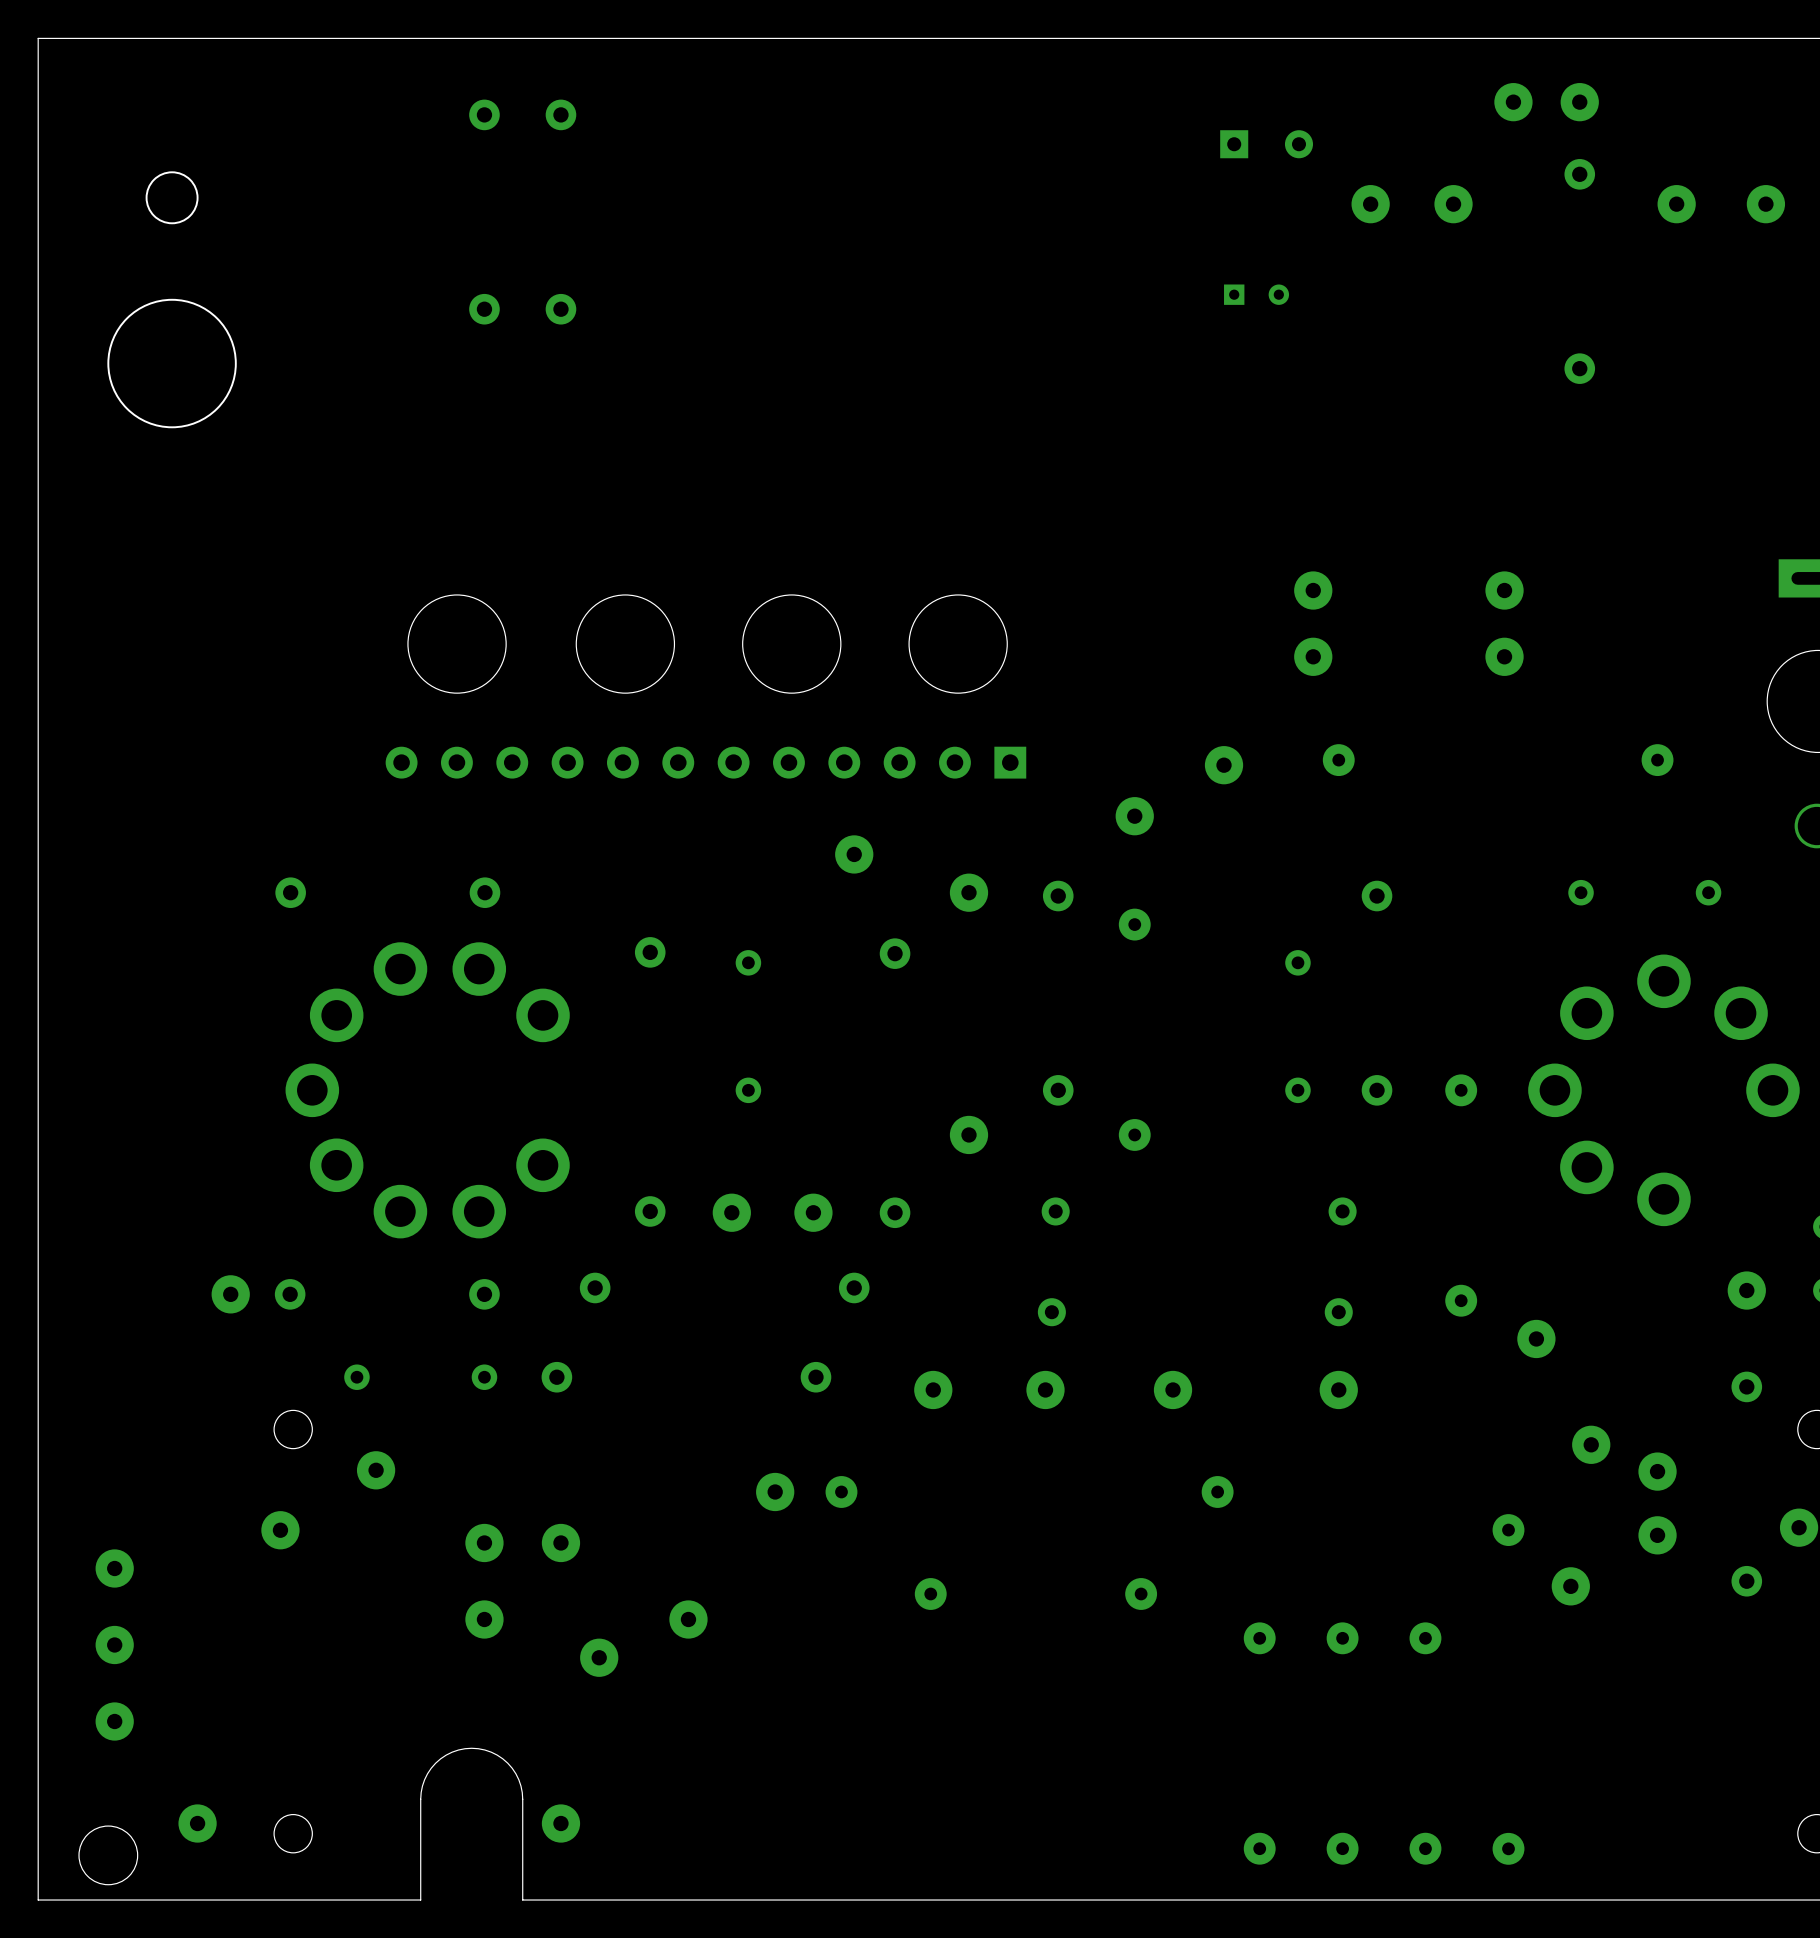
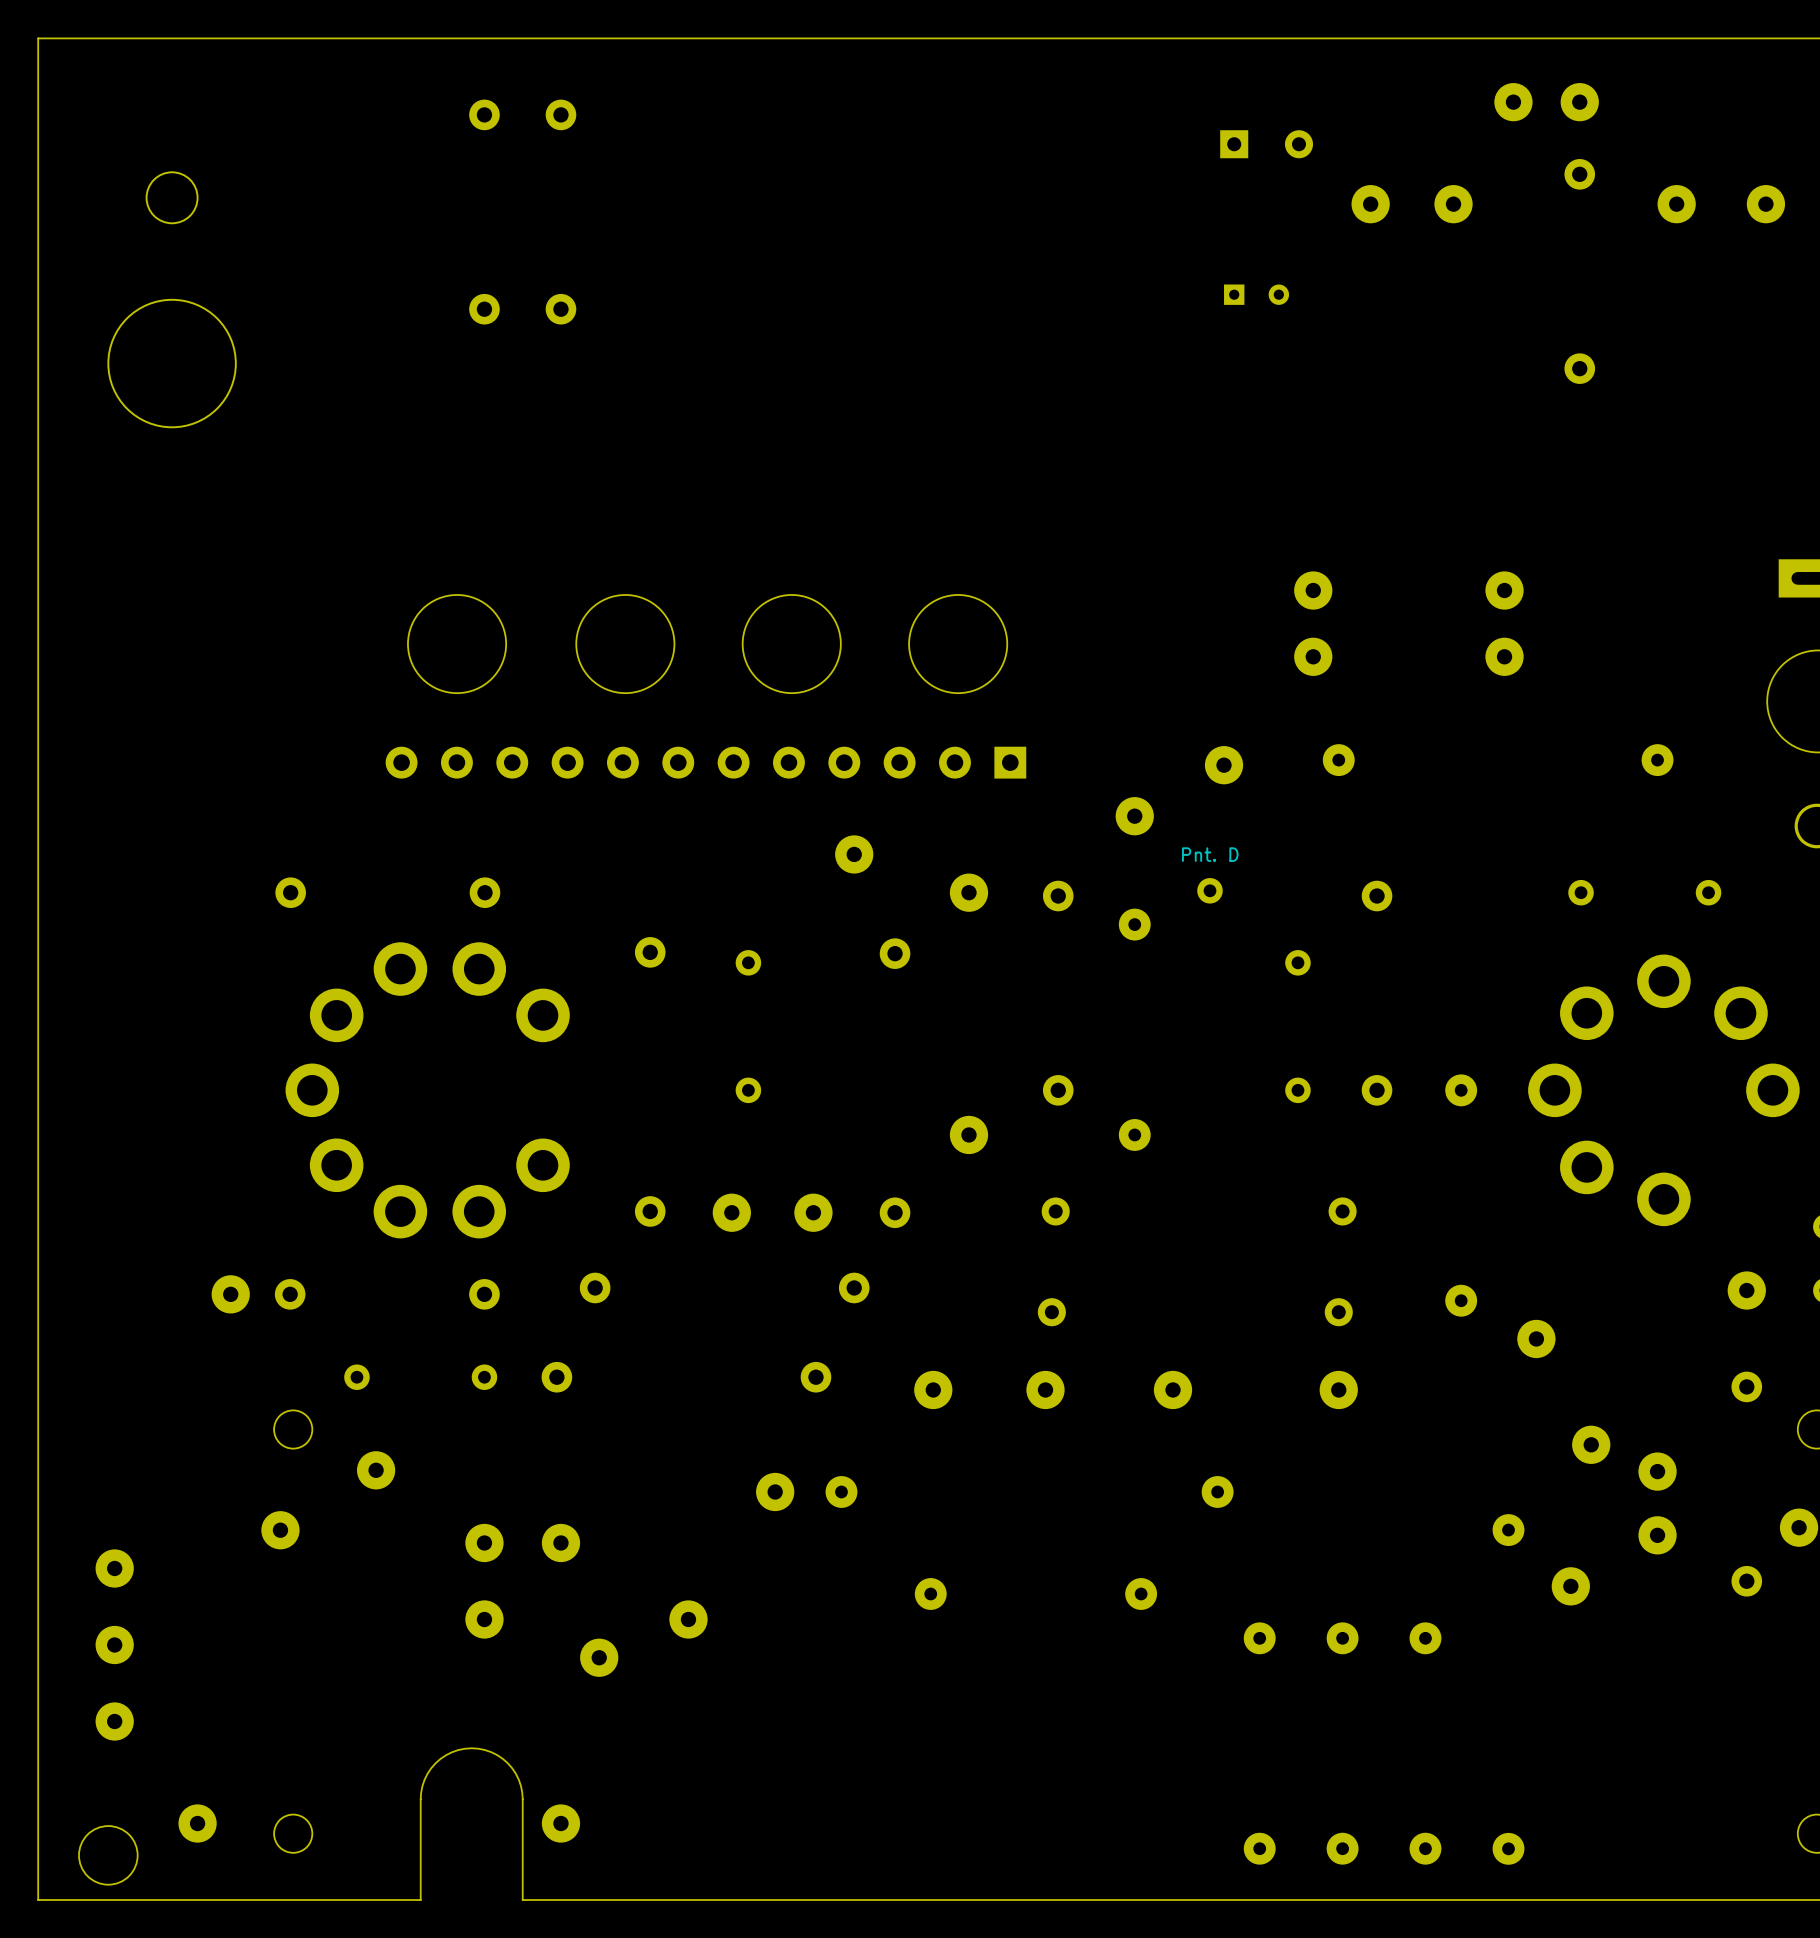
part: none -> Pnt. D (1209, 890)

